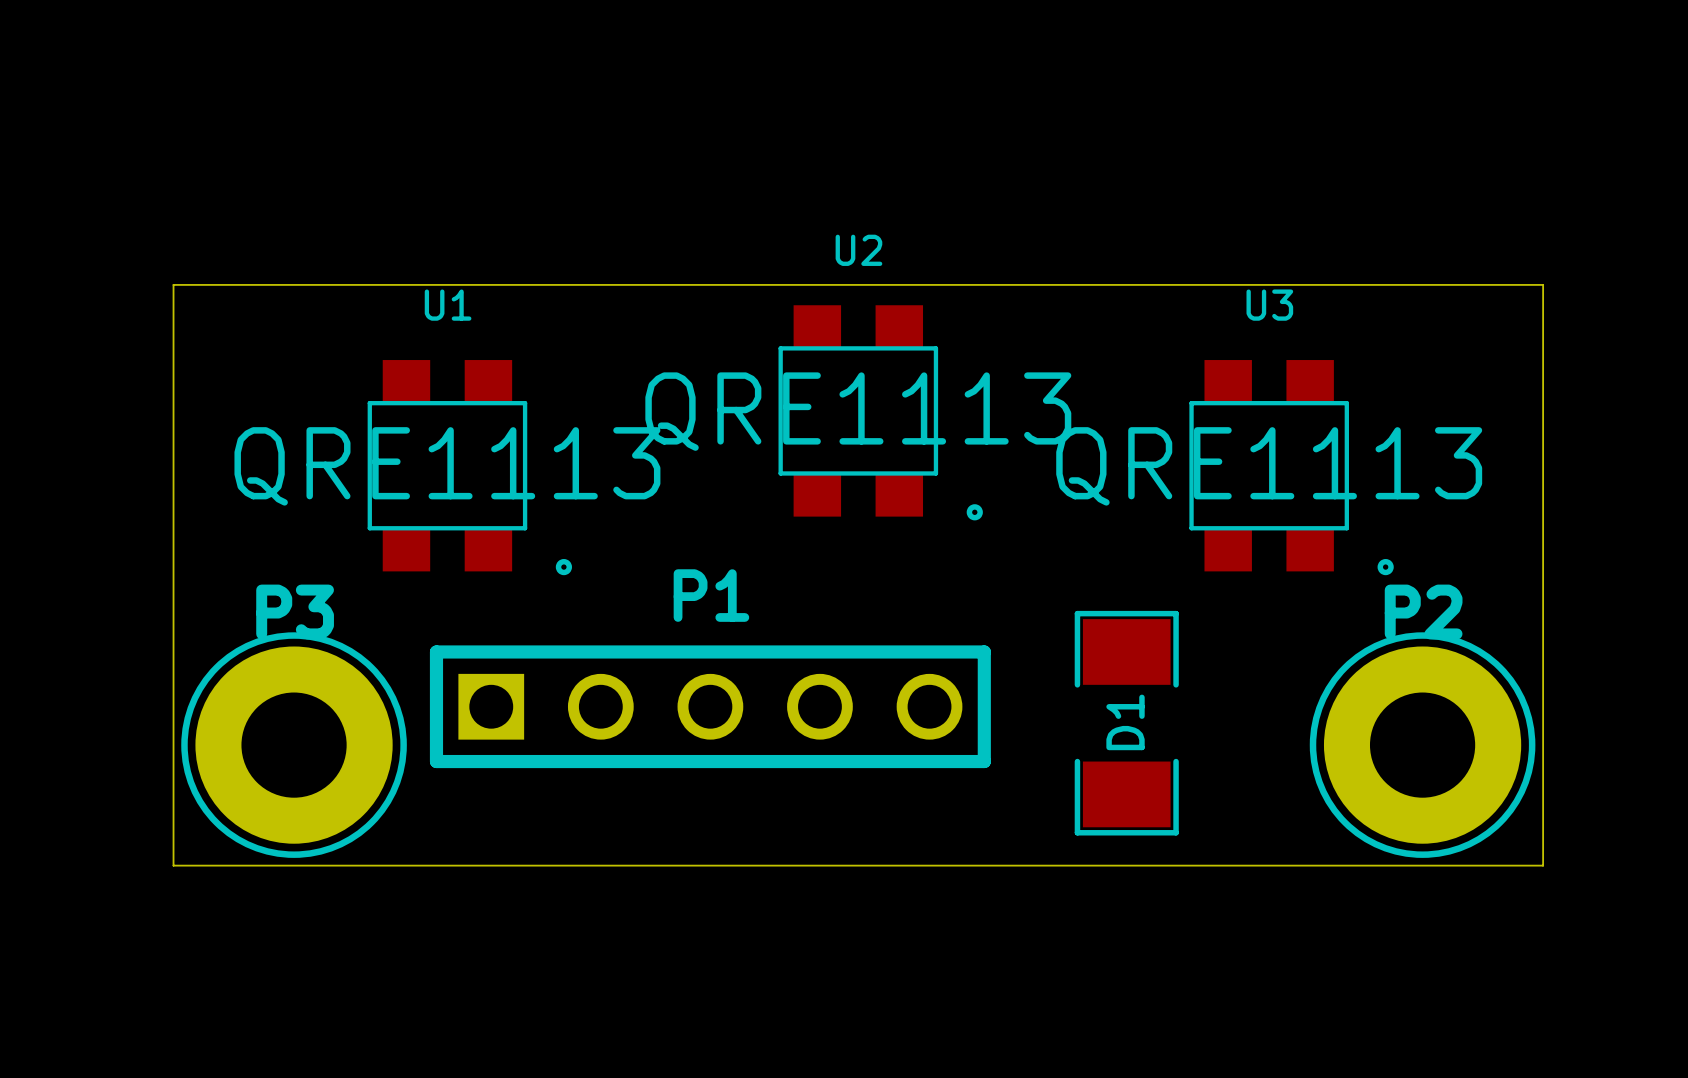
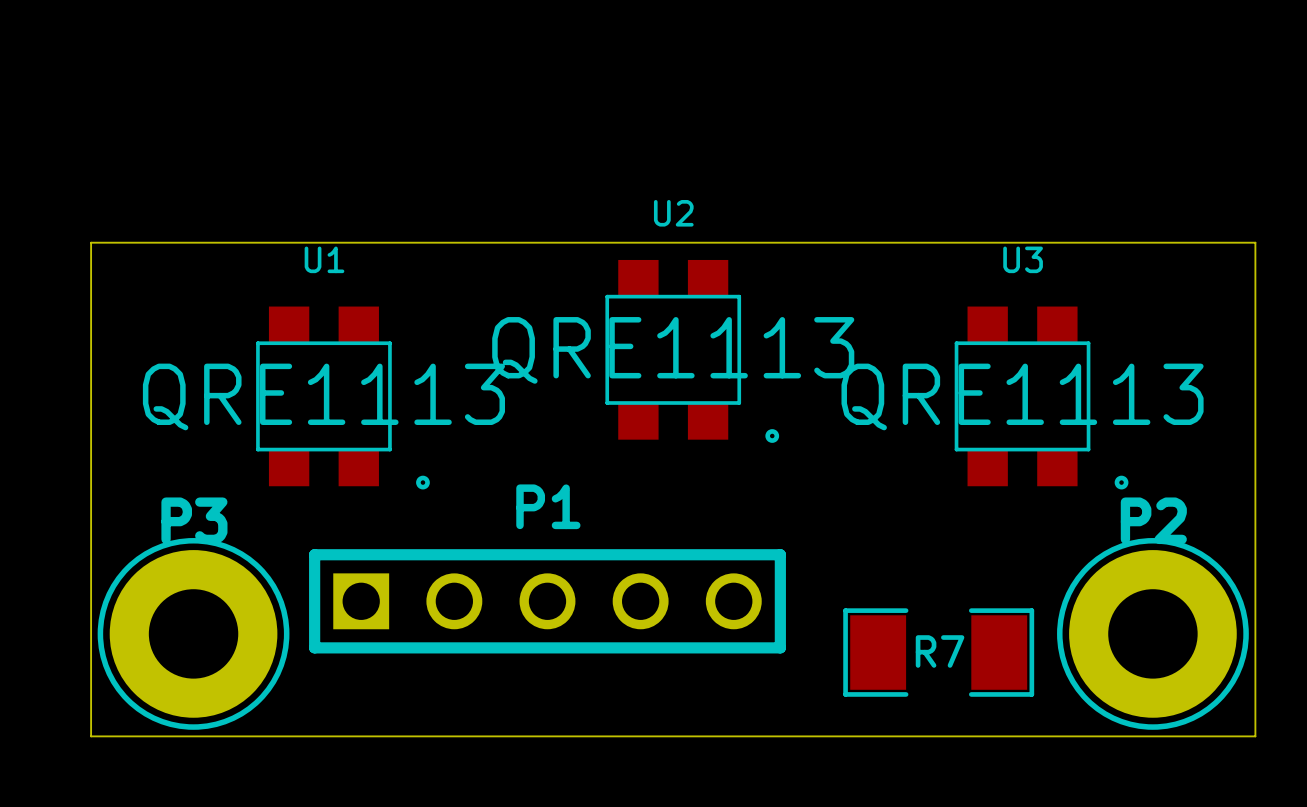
D1: (1126, 723) -> none
R7: none -> (938, 652)

